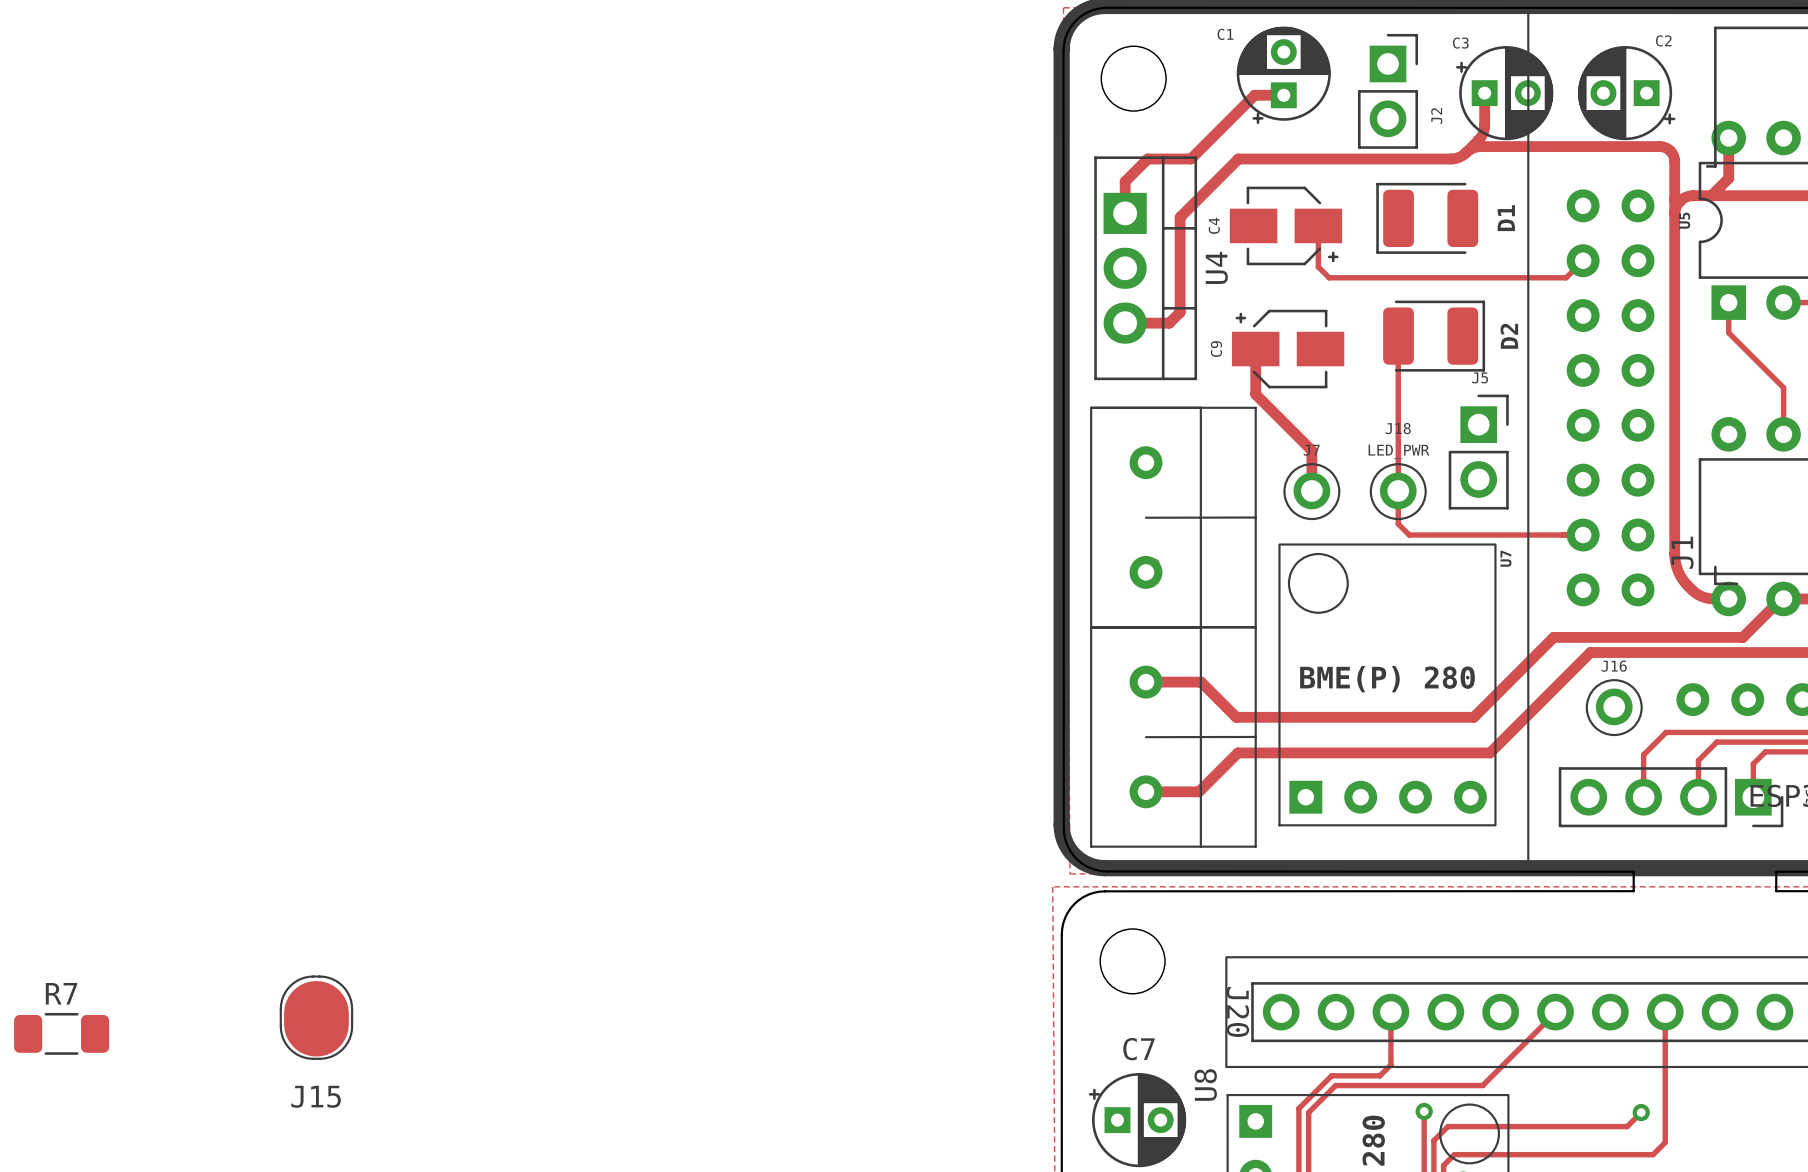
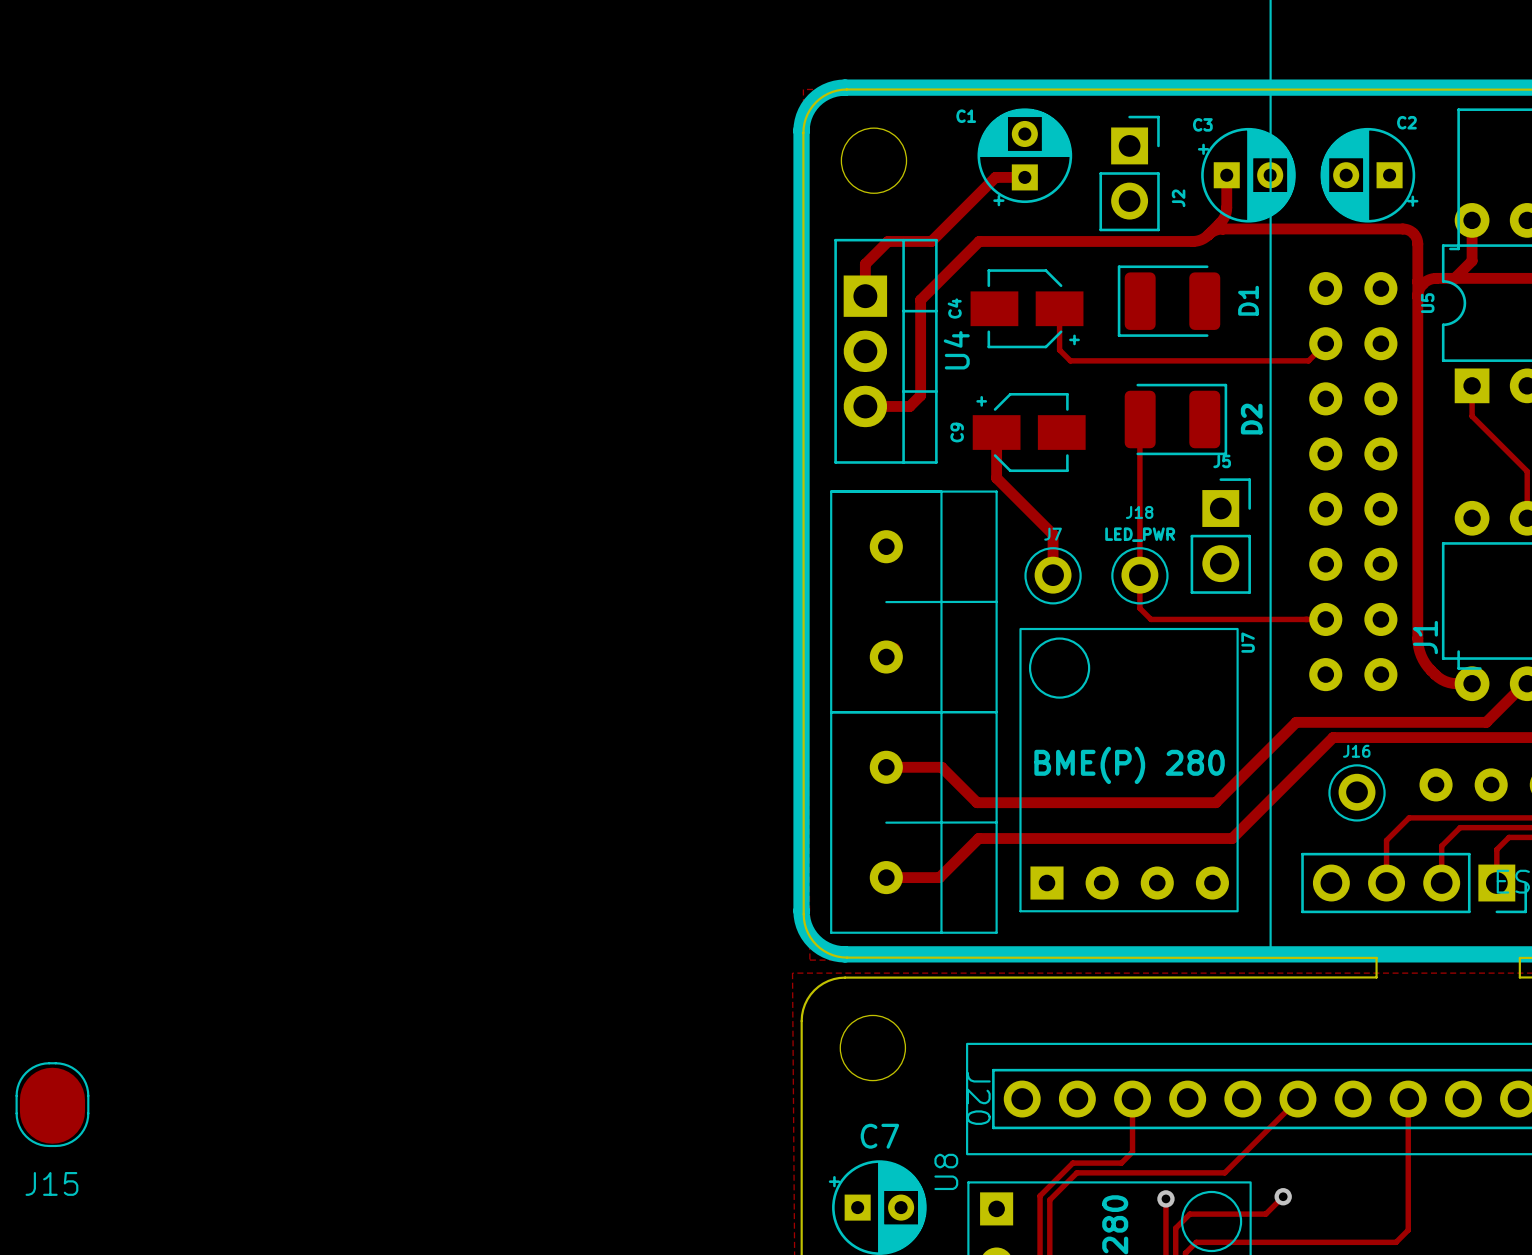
track: (1641, 1112) (1627, 1126) (1523, 1126) -> (1283, 1196) (1265, 1214)
via position: (1641, 1112) -> (1283, 1196)

